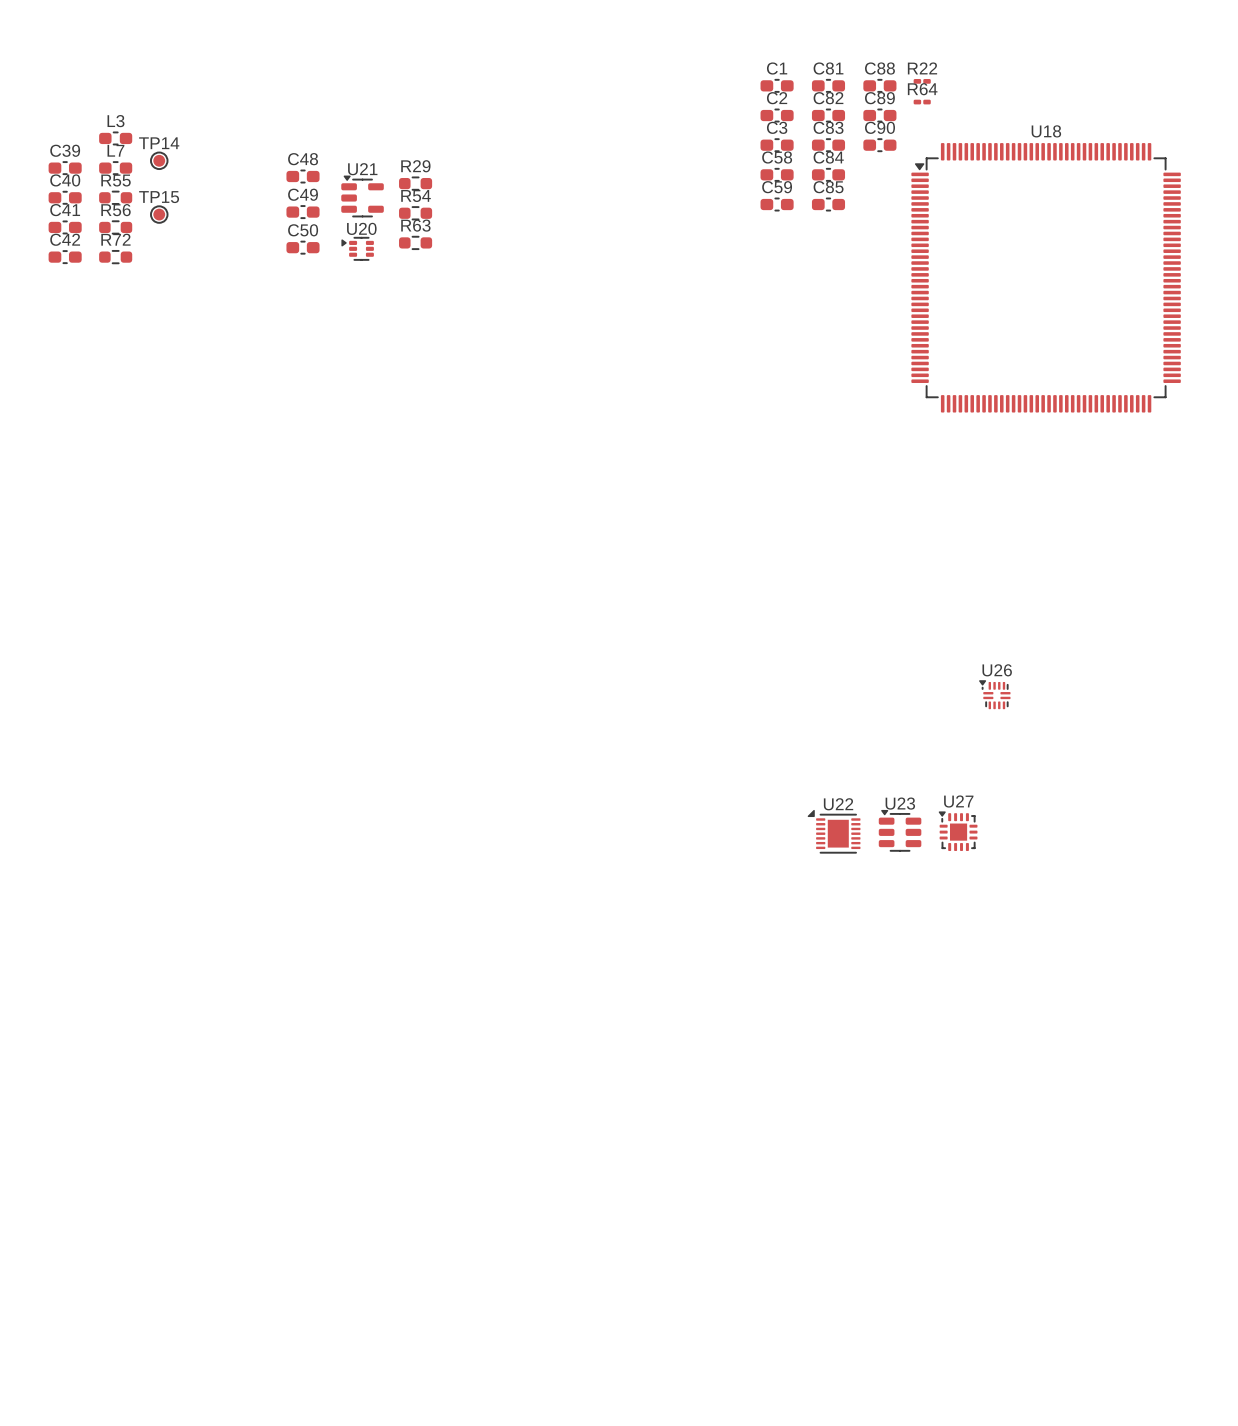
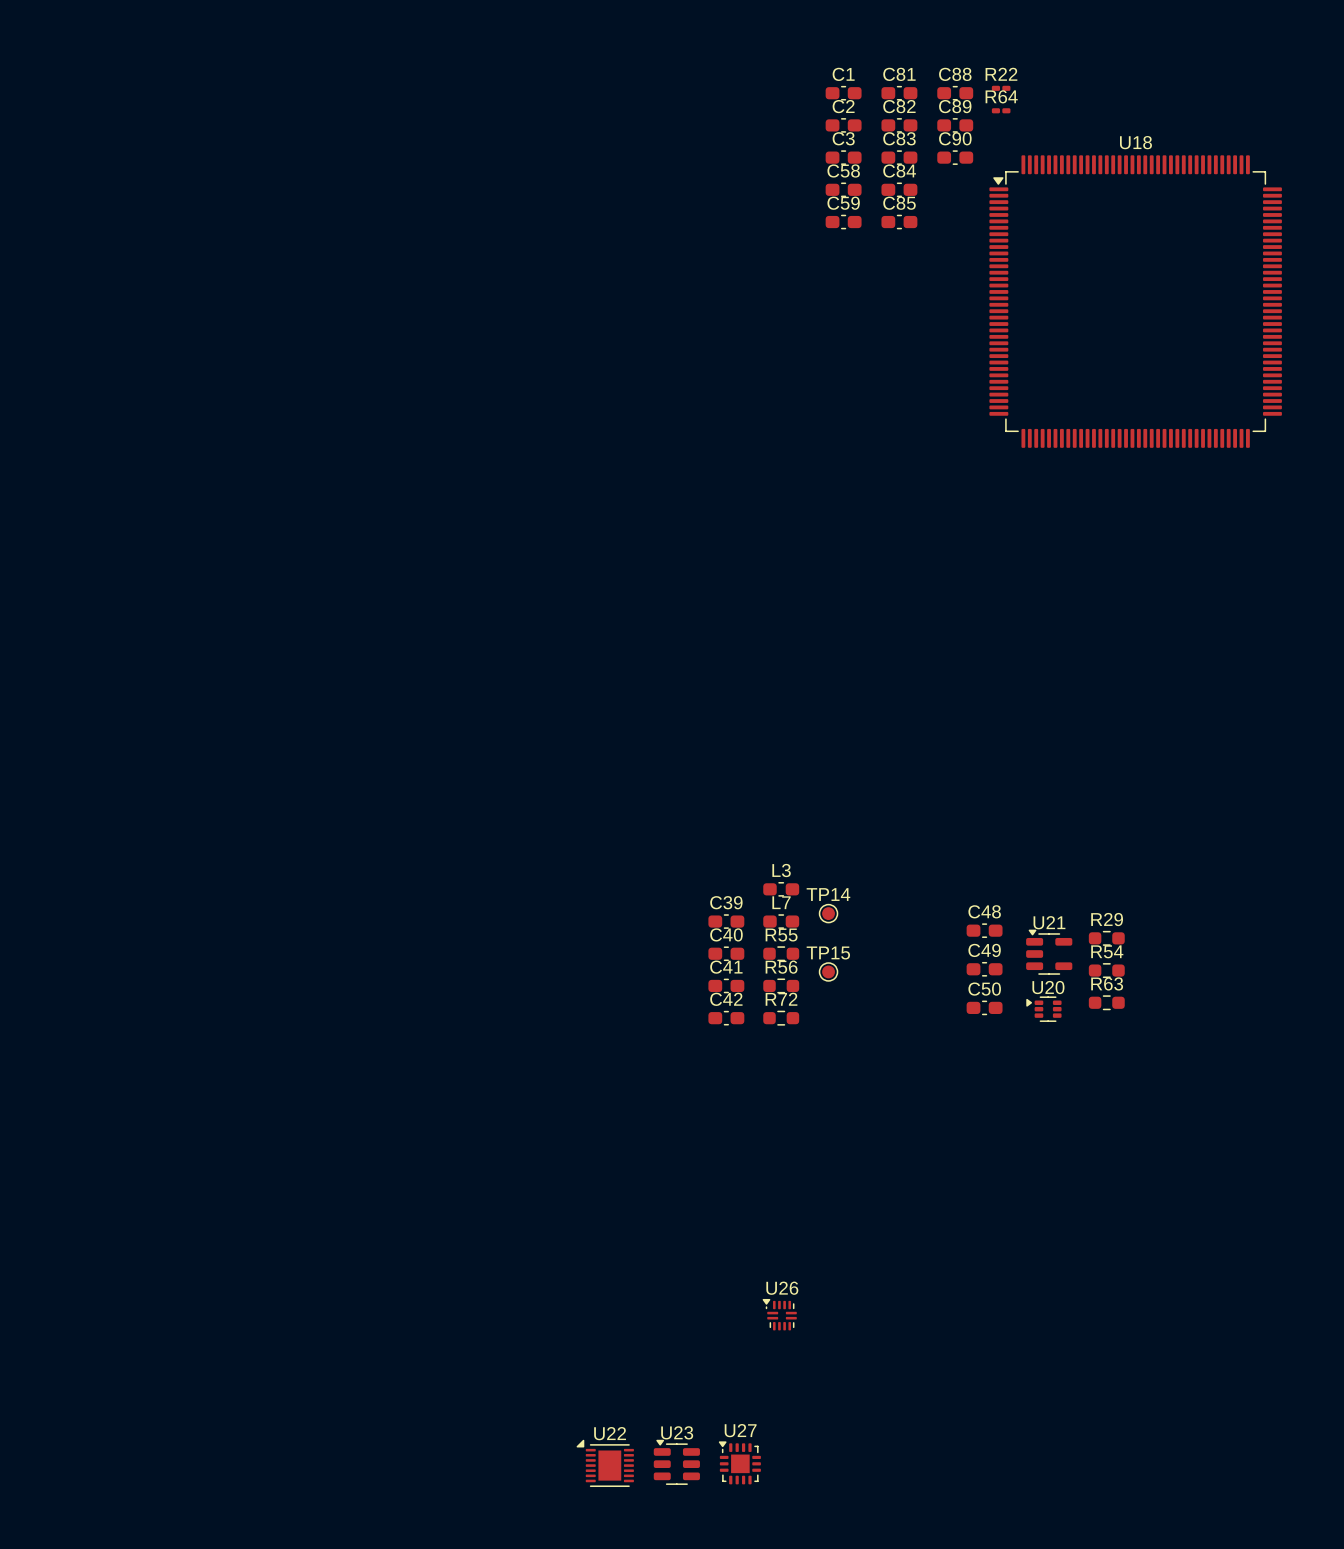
L3 position: (115, 138) -> (781, 889)
TP14 position: (159, 160) -> (828, 913)
C39 position: (65, 168) -> (726, 921)
L7 position: (115, 168) -> (781, 921)
C48 position: (303, 176) -> (984, 930)
R29 position: (415, 183) -> (1106, 938)
U21 position: (362, 196) -> (1049, 952)
C40 position: (65, 197) -> (726, 953)
R55 position: (115, 197) -> (781, 953)
C49 position: (303, 212) -> (984, 969)
R54 position: (415, 213) -> (1106, 970)
TP15 position: (159, 214) -> (828, 971)
C41 position: (65, 227) -> (726, 985)
R56 position: (115, 227) -> (781, 985)
R63 position: (415, 242) -> (1106, 1002)
C50 position: (303, 247) -> (984, 1007)
U20 position: (357, 248) -> (1043, 1009)
C42 position: (65, 257) -> (726, 1018)
R72 position: (115, 257) -> (781, 1018)
U26 position: (994, 694) -> (779, 1314)
U23 position: (900, 830) -> (676, 1462)
U22 position: (834, 831) -> (605, 1463)
U27 position: (958, 831) -> (739, 1462)

